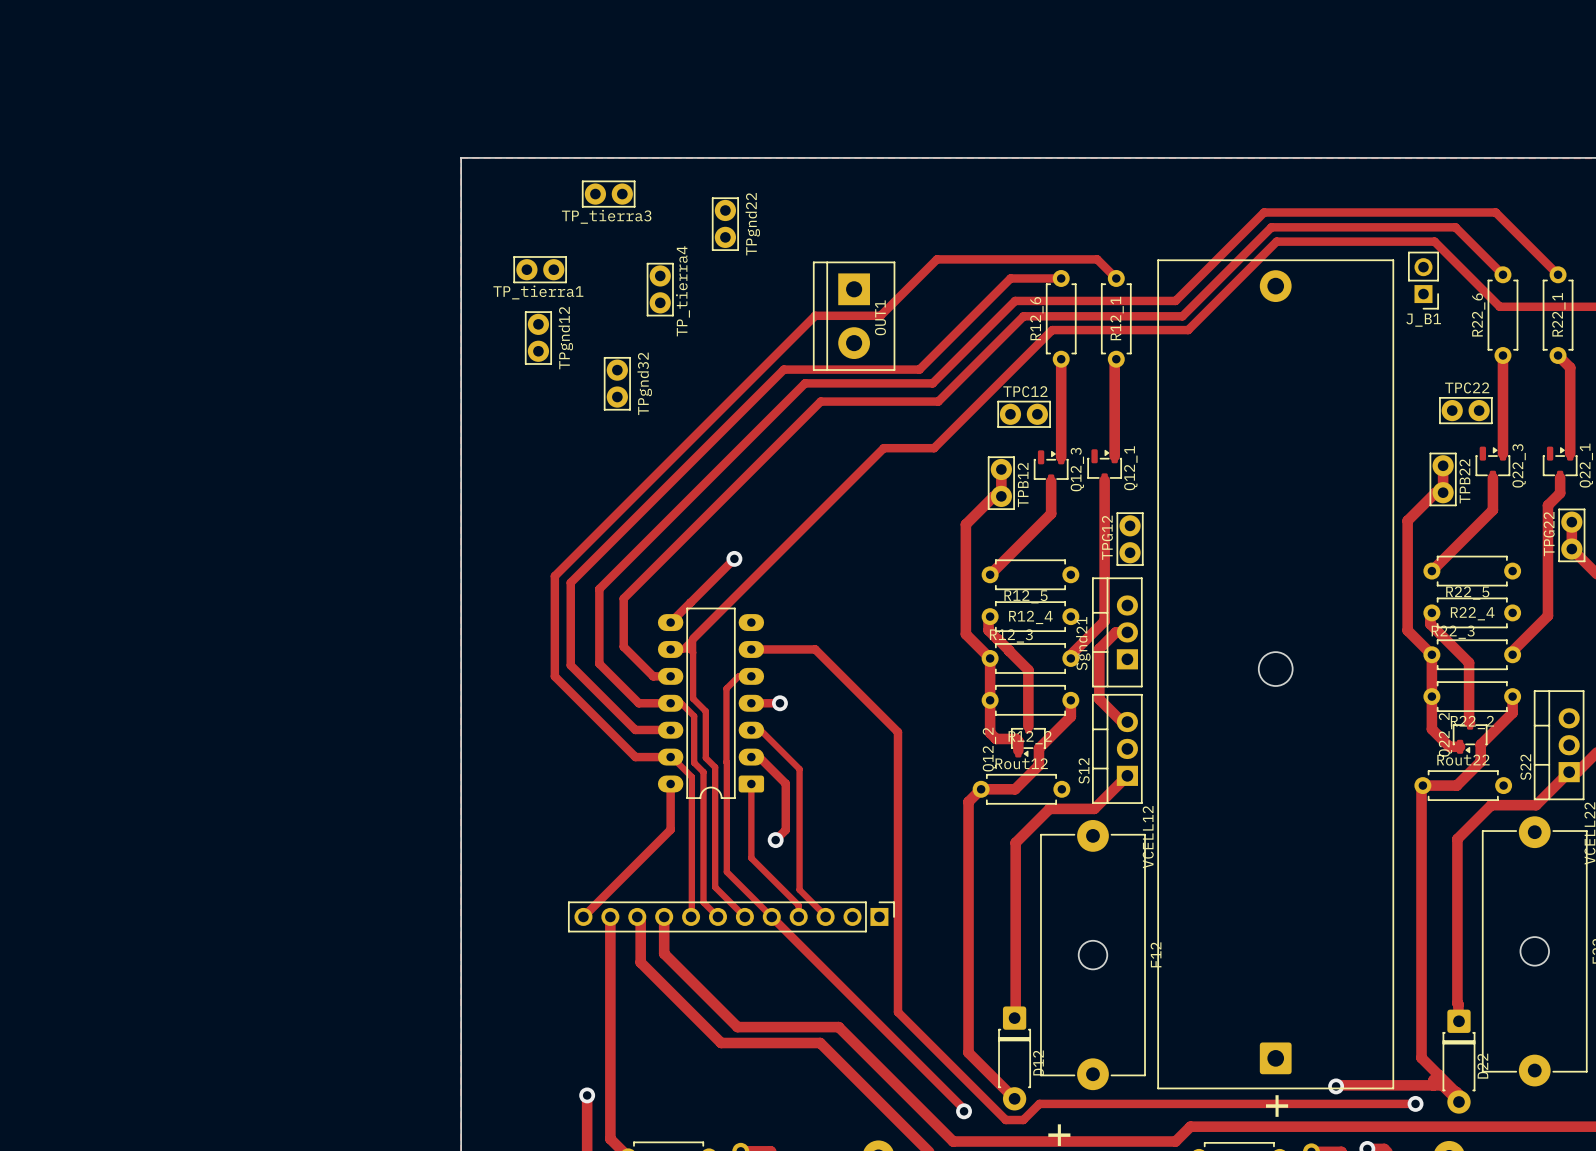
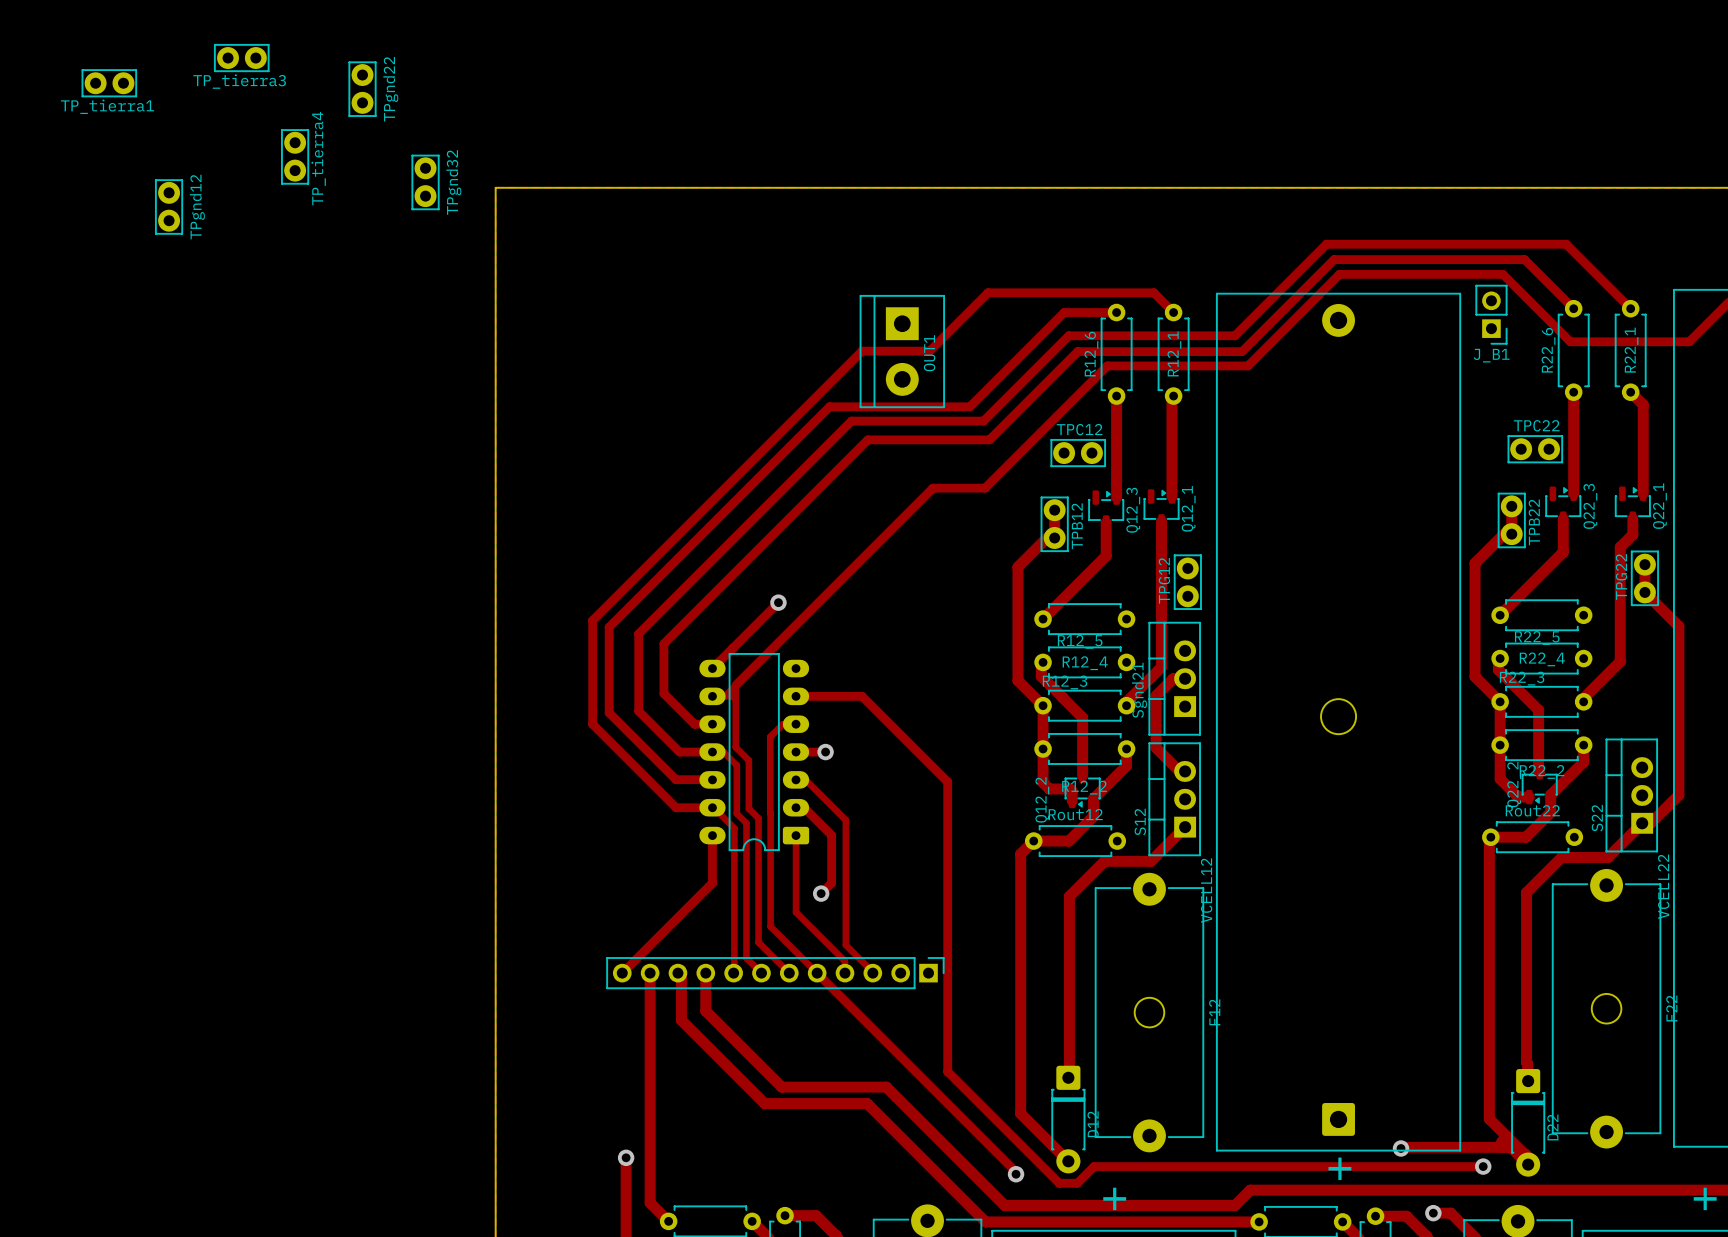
TP_tierra3 position: (608, 194) -> (241, 58)
TPgnd22 position: (725, 224) -> (362, 89)
TP_tierra1 position: (540, 269) -> (109, 83)
TP_tierra4 position: (660, 289) -> (295, 156)
TPgnd12 position: (538, 338) -> (169, 206)
TPgnd32 position: (617, 383) -> (425, 182)

